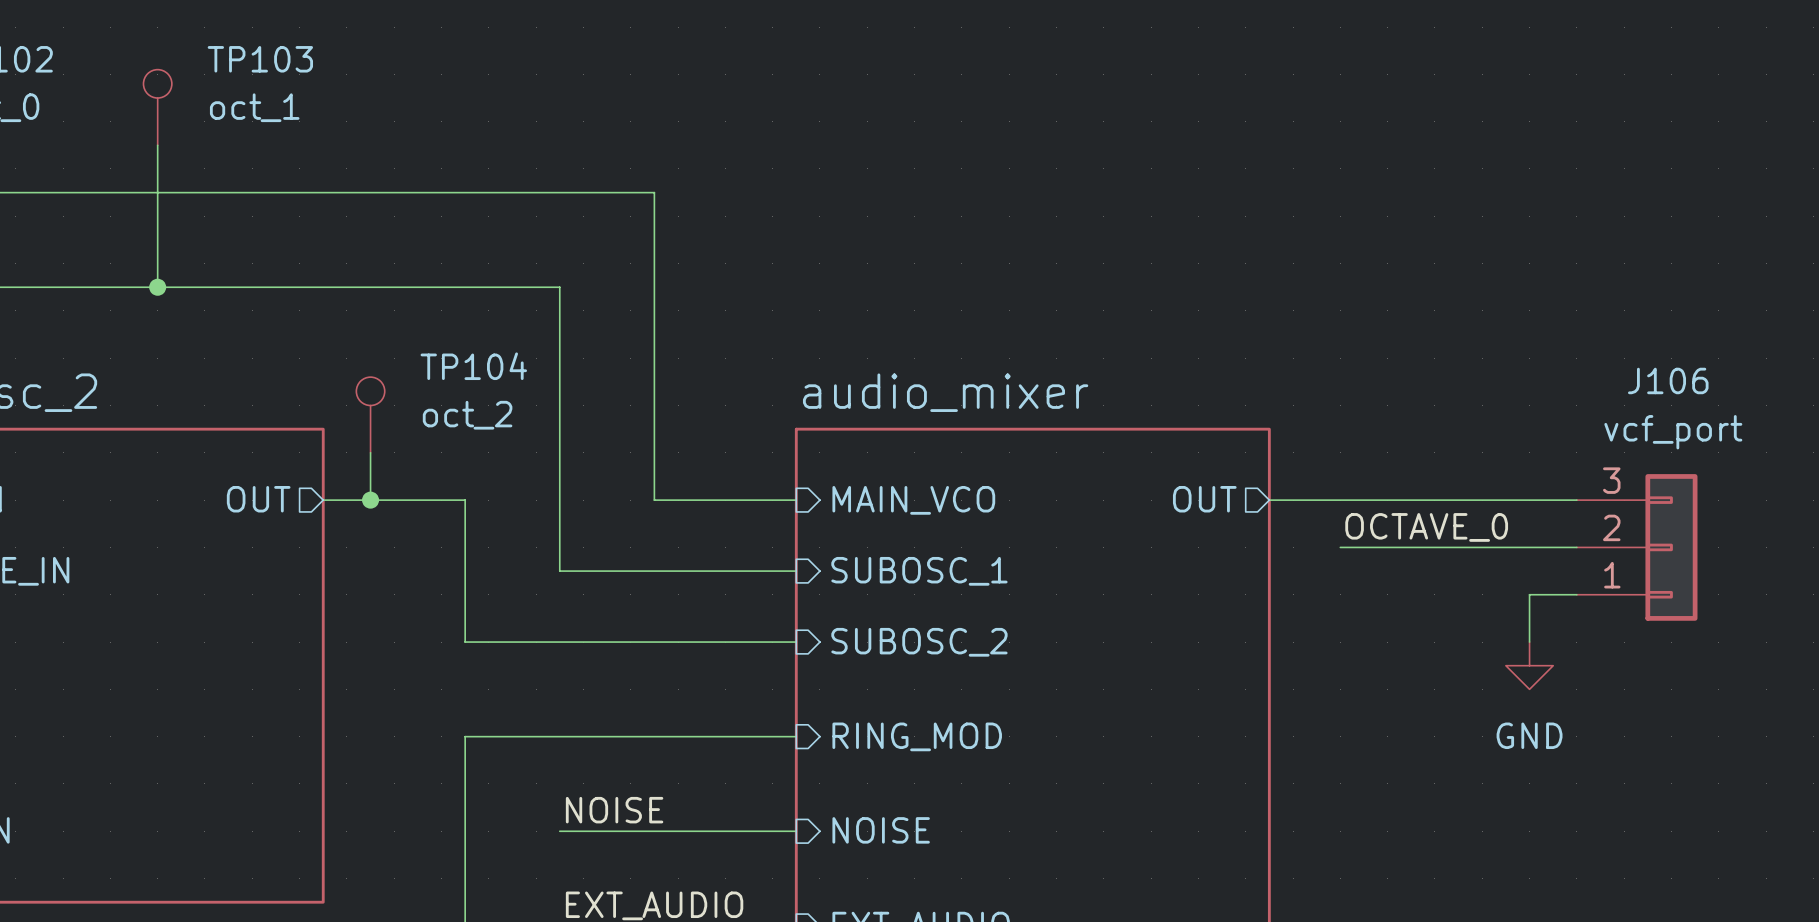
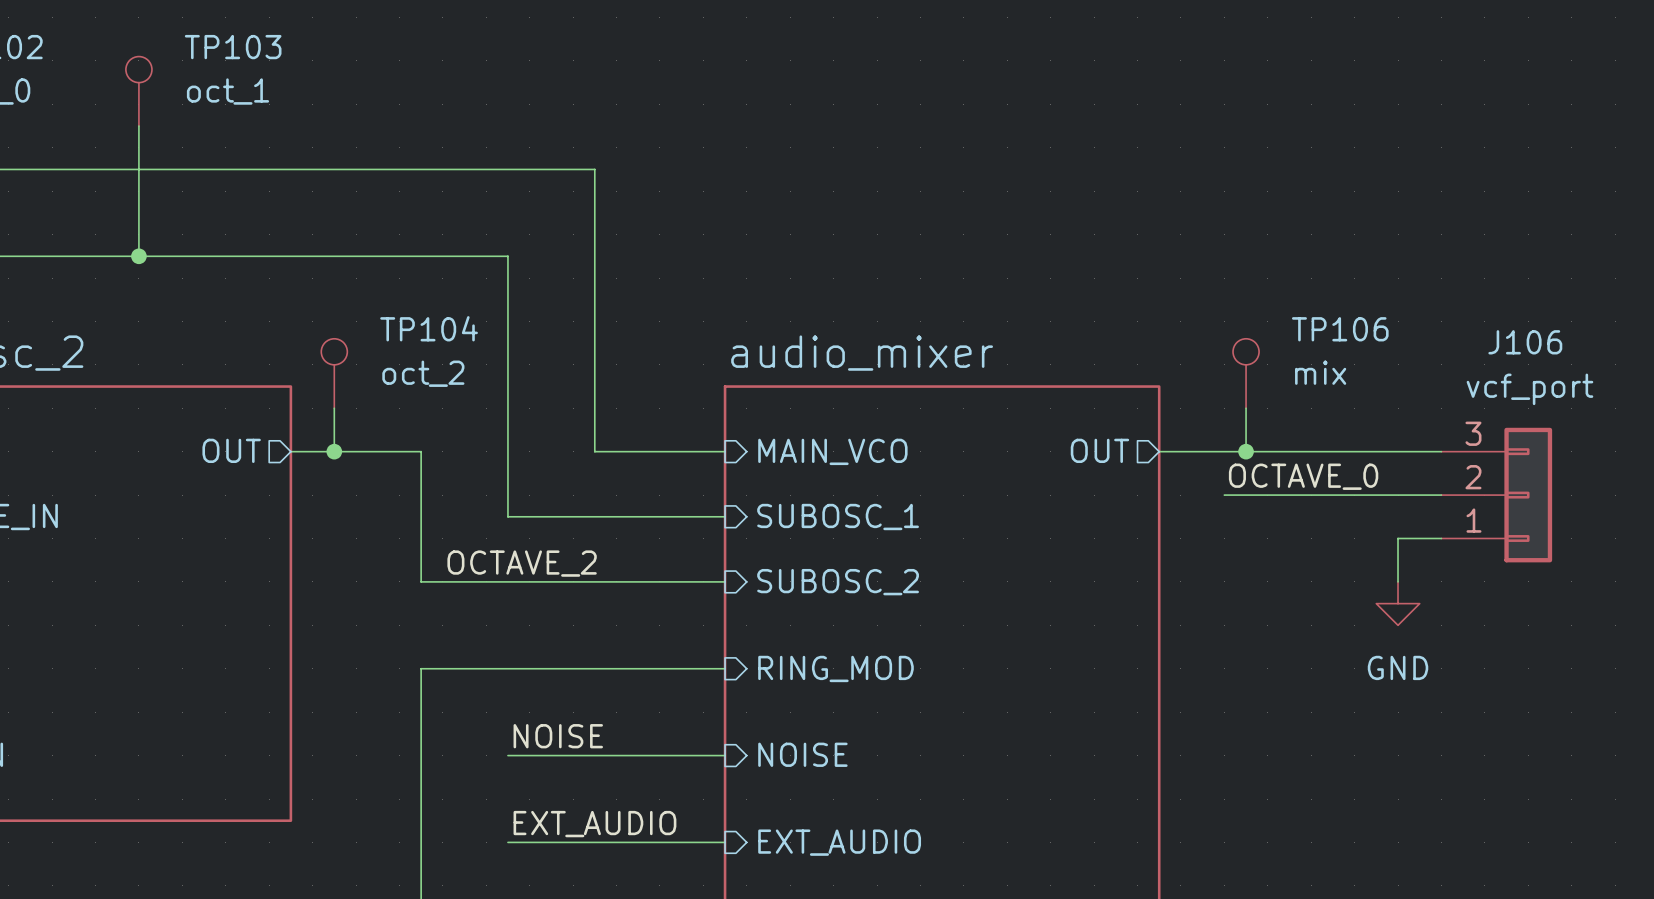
TP106: none -> mix (1246, 373)
wire: none -> (1246, 408) (1246, 451)
junction: none -> (1246, 451)
label: none -> OCTAVE_2 (522, 563)

